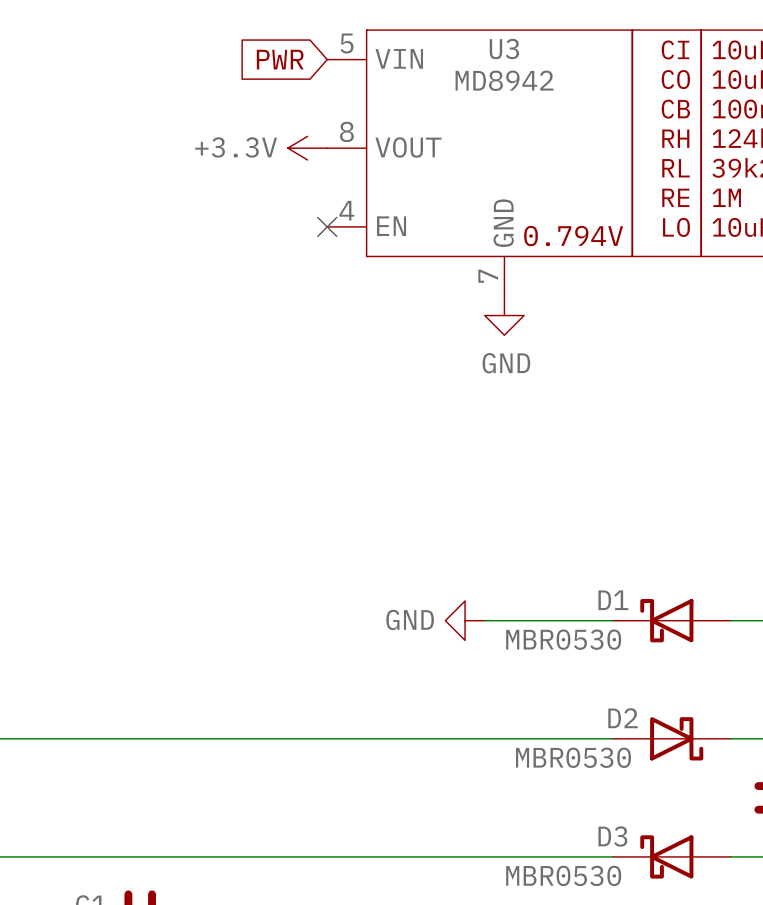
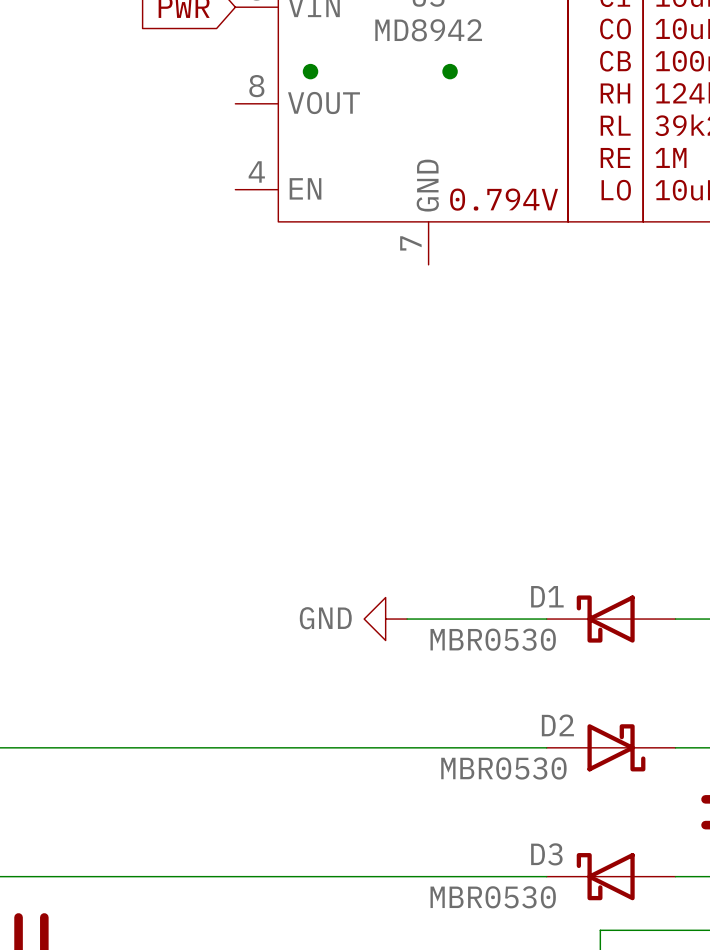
junction: none -> (310, 71)
junction: none -> (450, 71)
power symbol: +3.3V (307, 148) -> none
no-connect mark: (327, 226) -> none
power symbol: GND (504, 315) -> none

